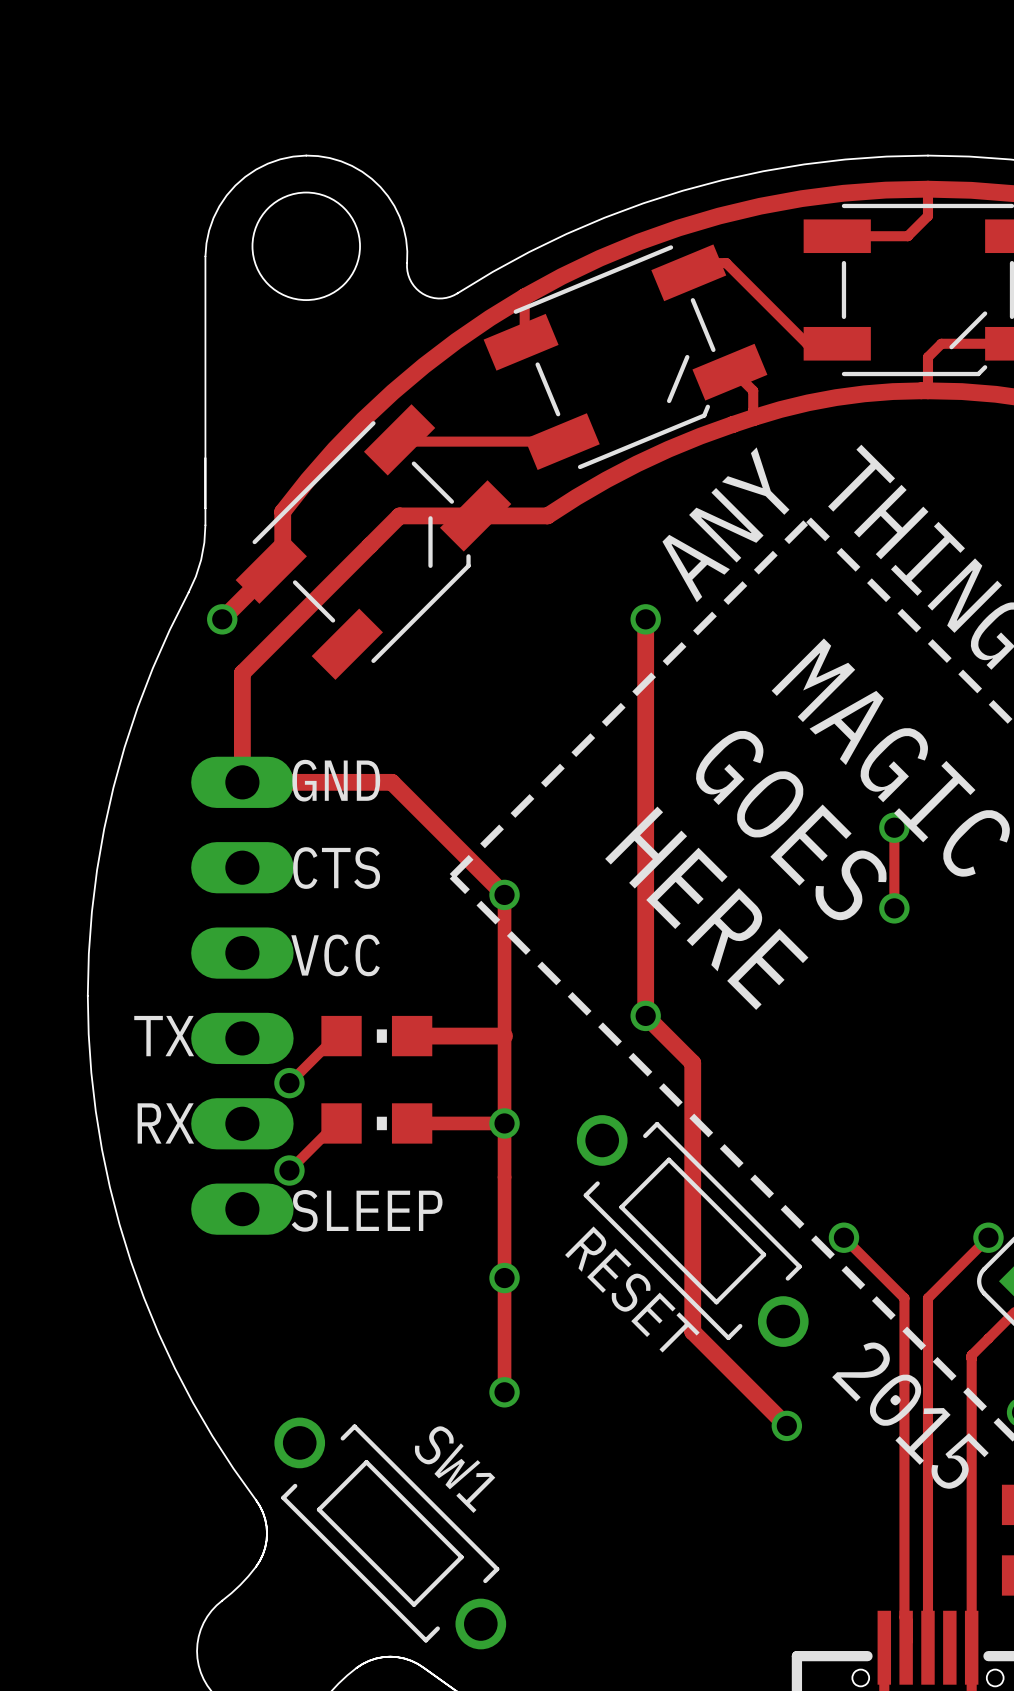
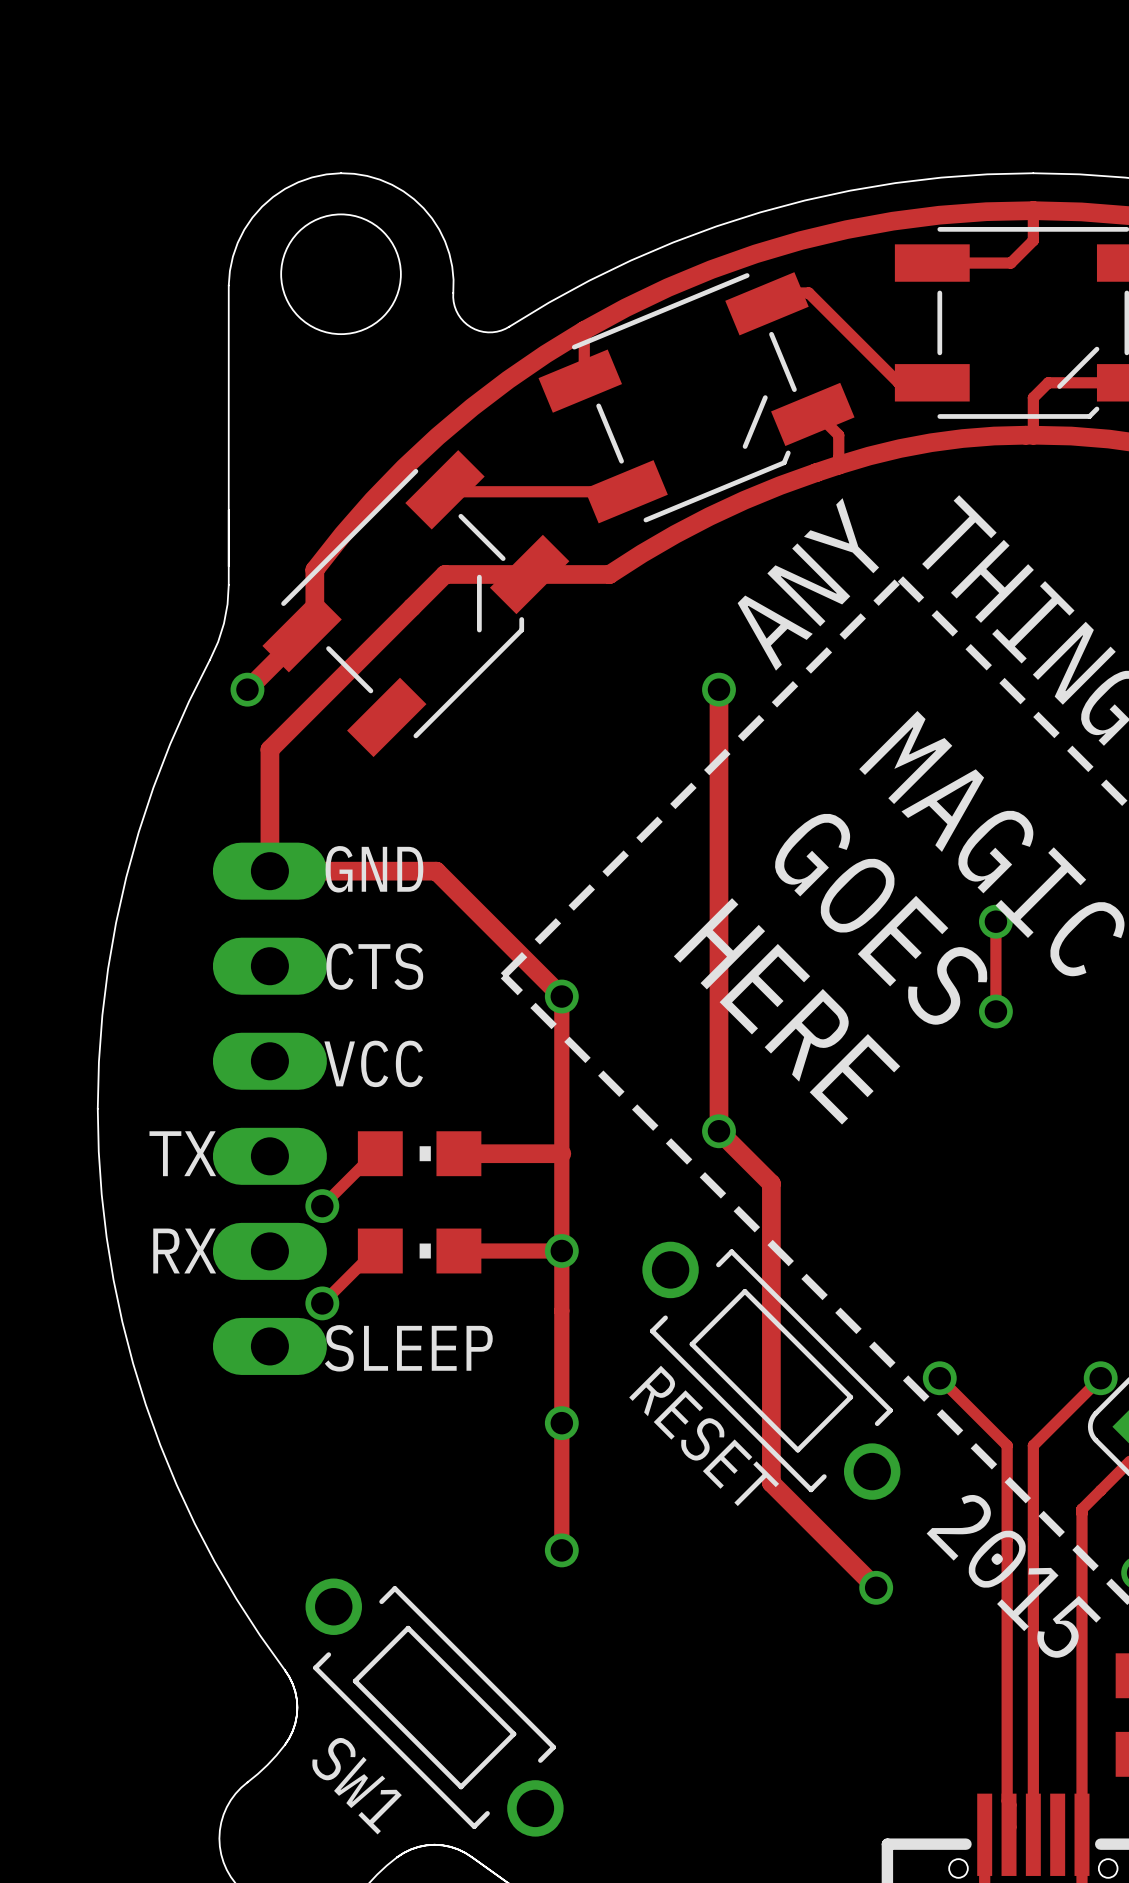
SW1 name position: SW1 (454, 1469) -> SW1 (356, 1786)

